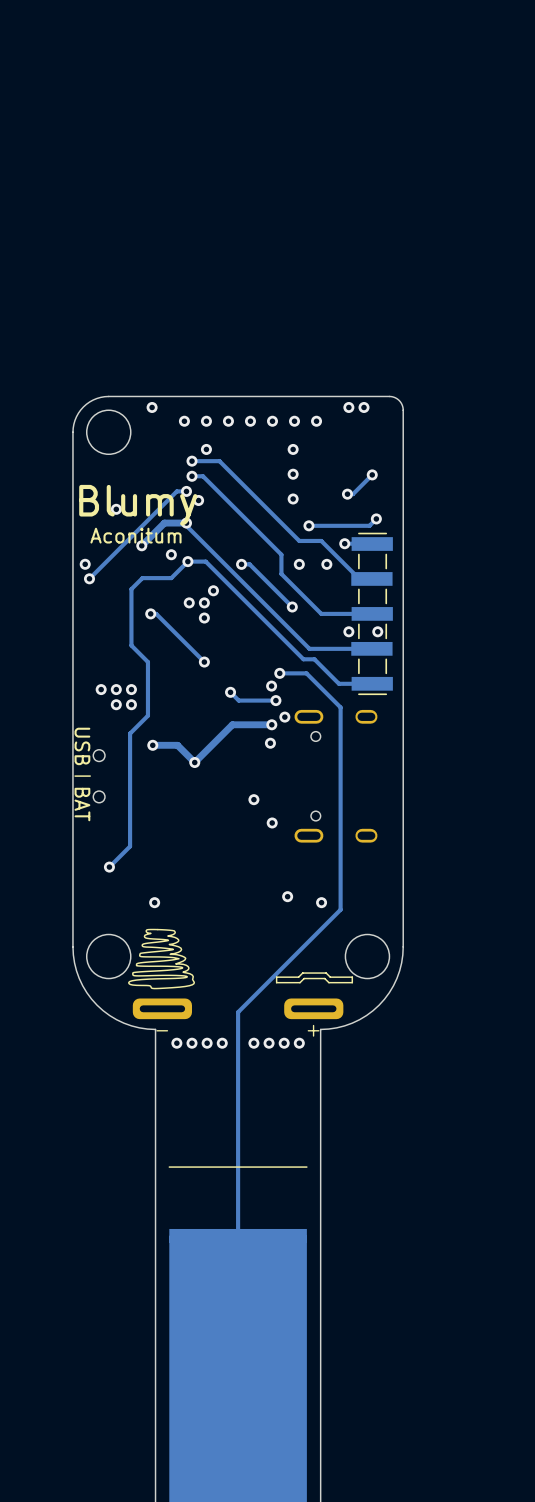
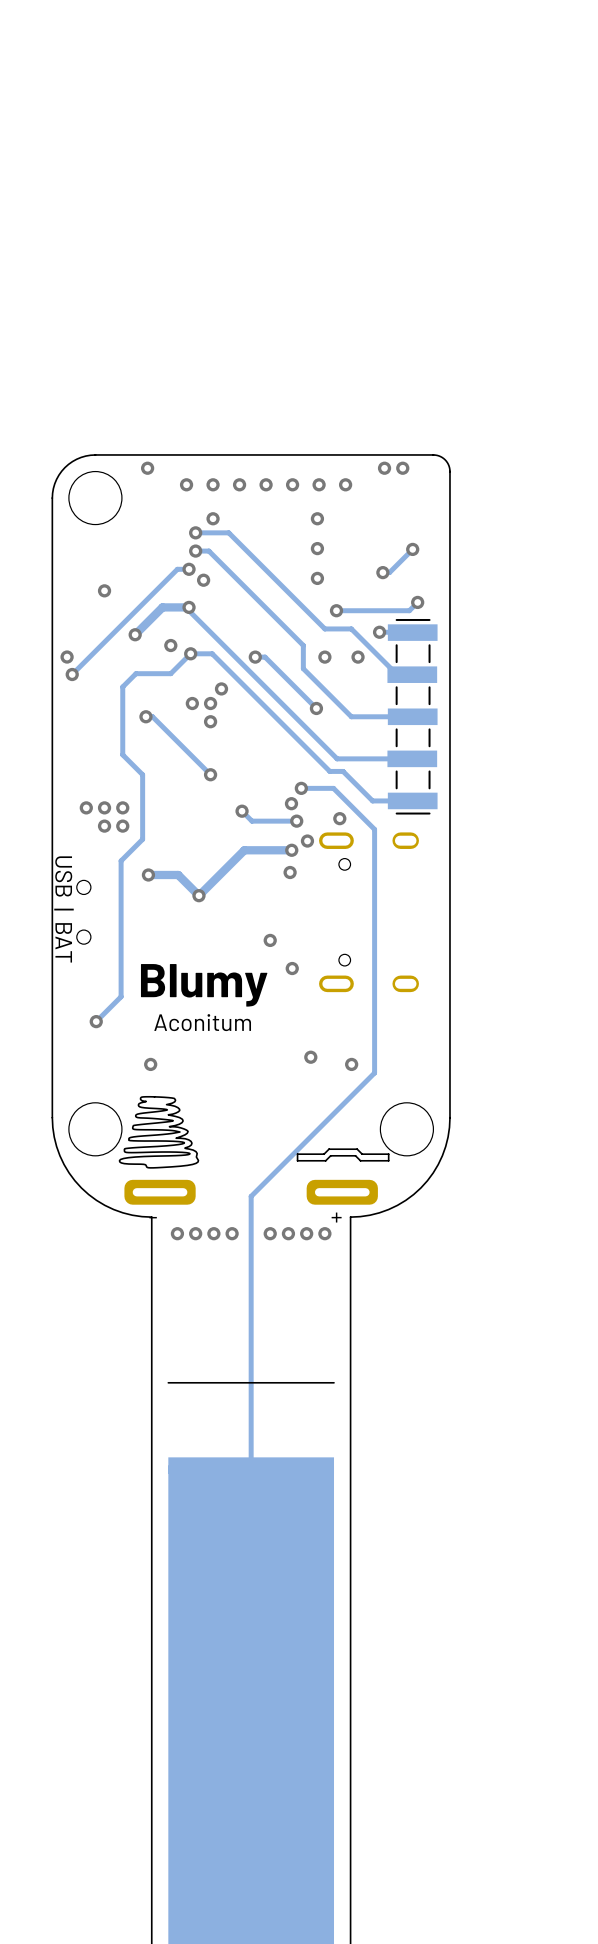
text position: Blumy (138, 505) -> Blumy (204, 985)
text position: Aconitum (135, 535) -> Aconitum (202, 1022)
via: (348, 631) -> none
via: (377, 631) -> none
via: none -> (339, 818)

